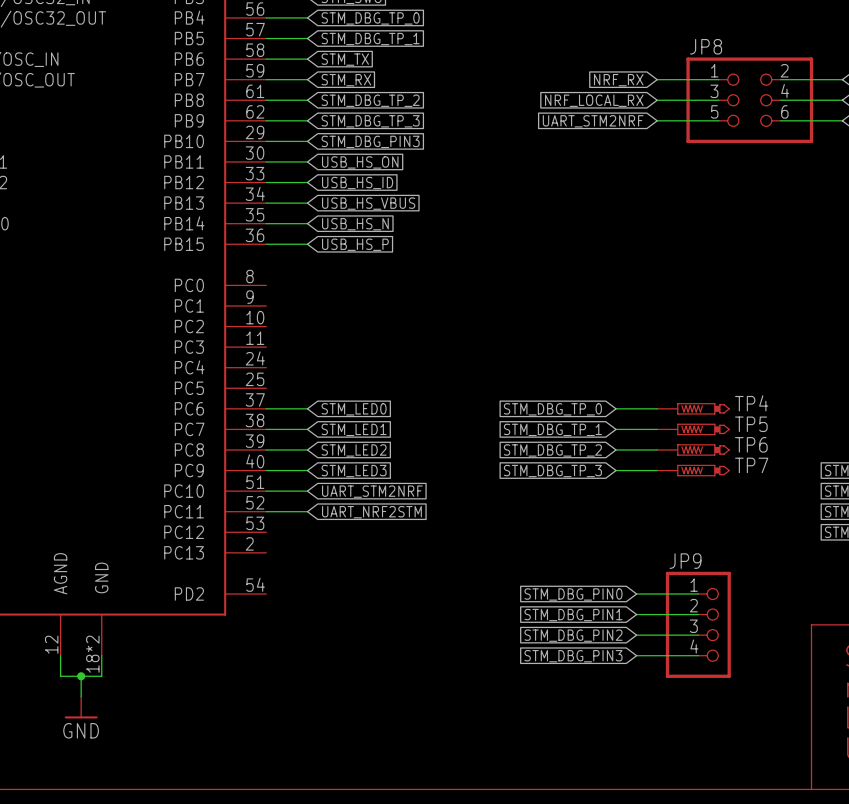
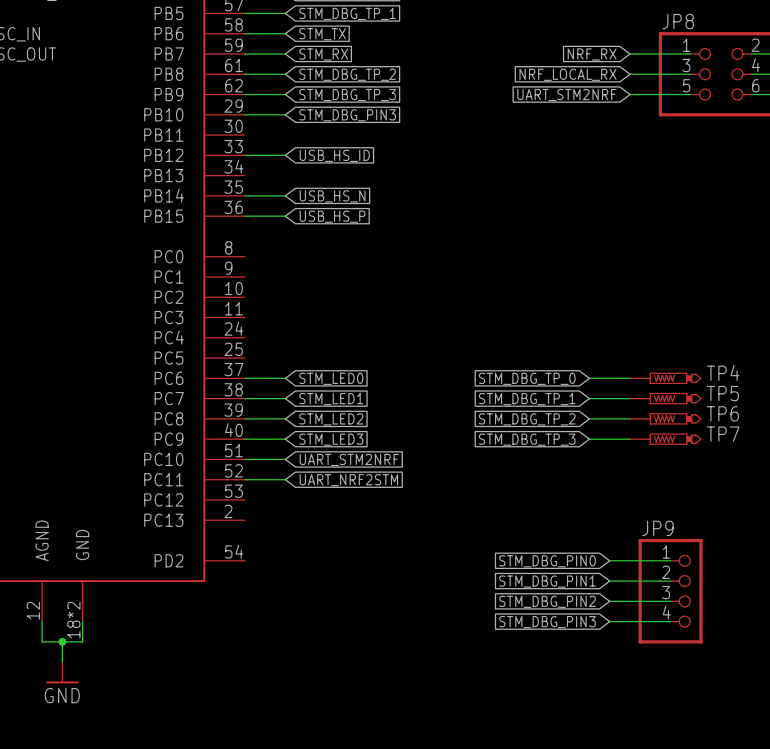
wire: (266, 161) (307, 161) -> none
global label: USB_HS_ON (360, 162) -> none
wire: (266, 203) (307, 203) -> none
global label: USB_HS_VBUS (368, 203) -> none

